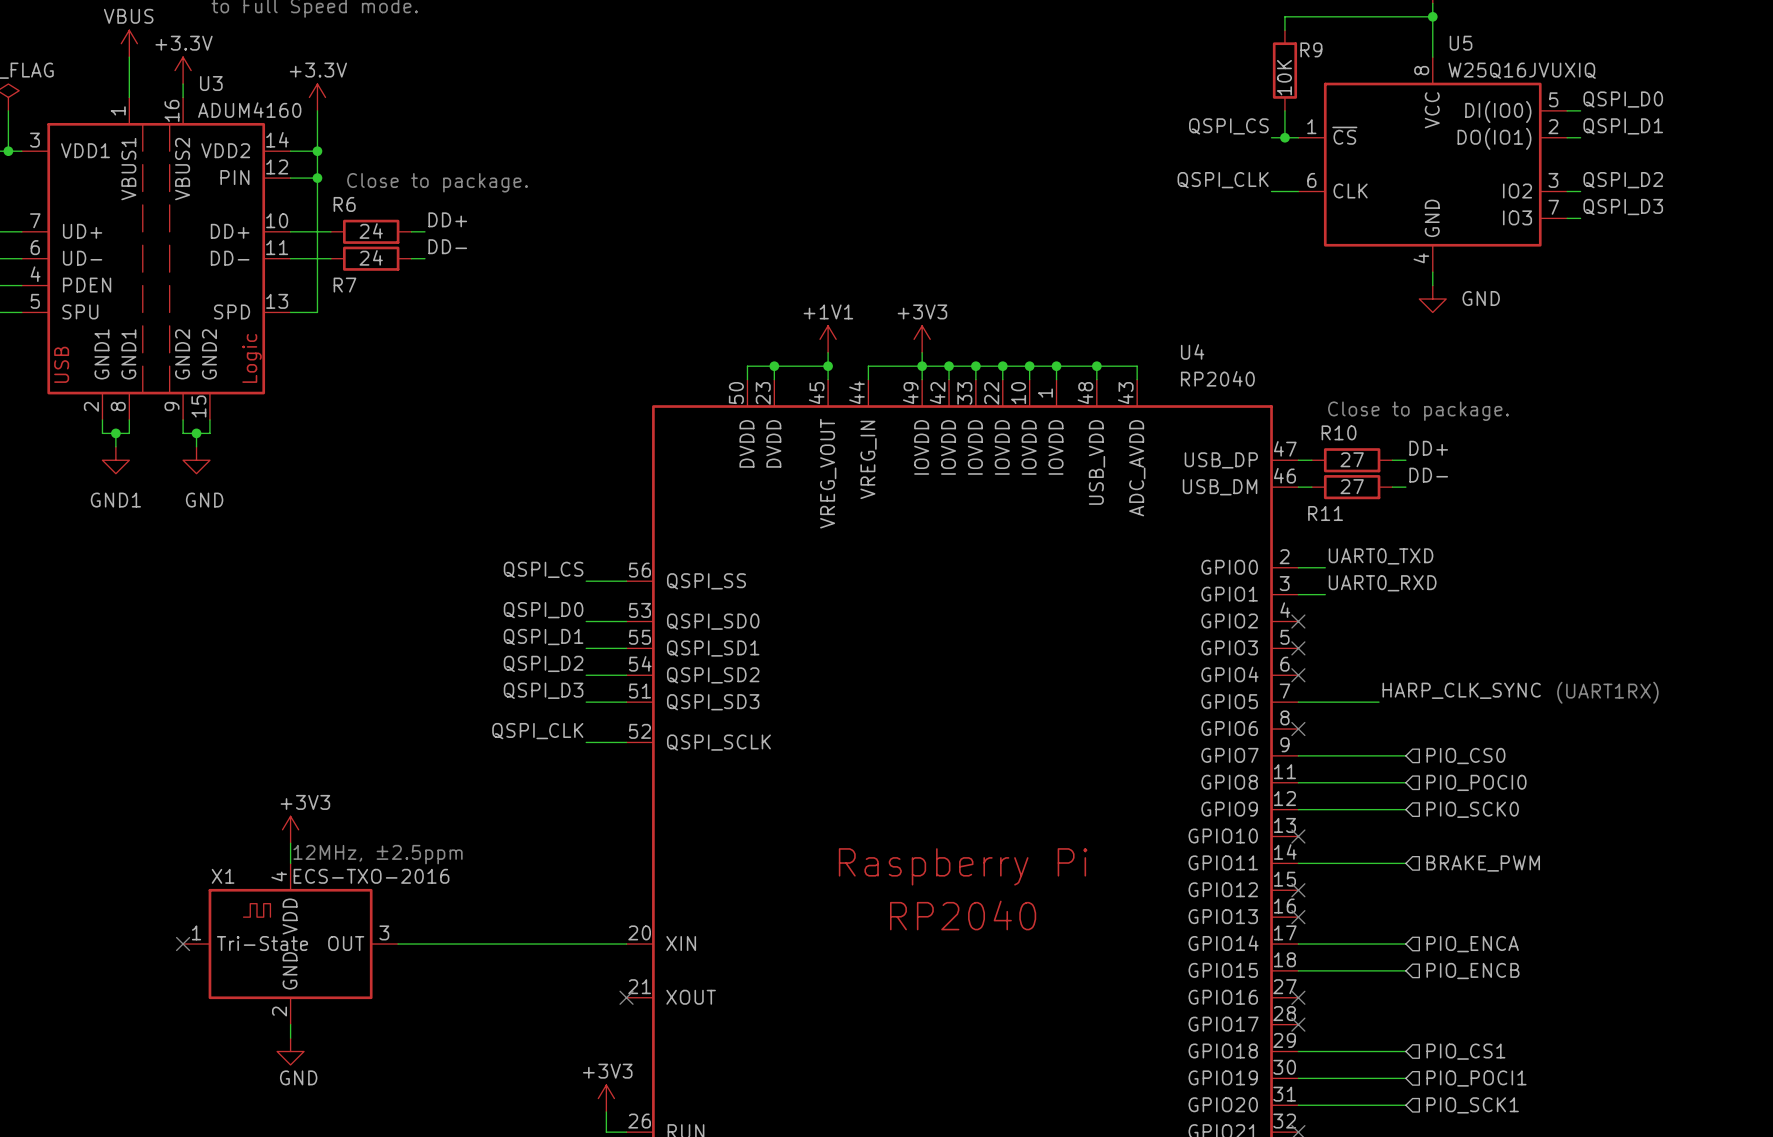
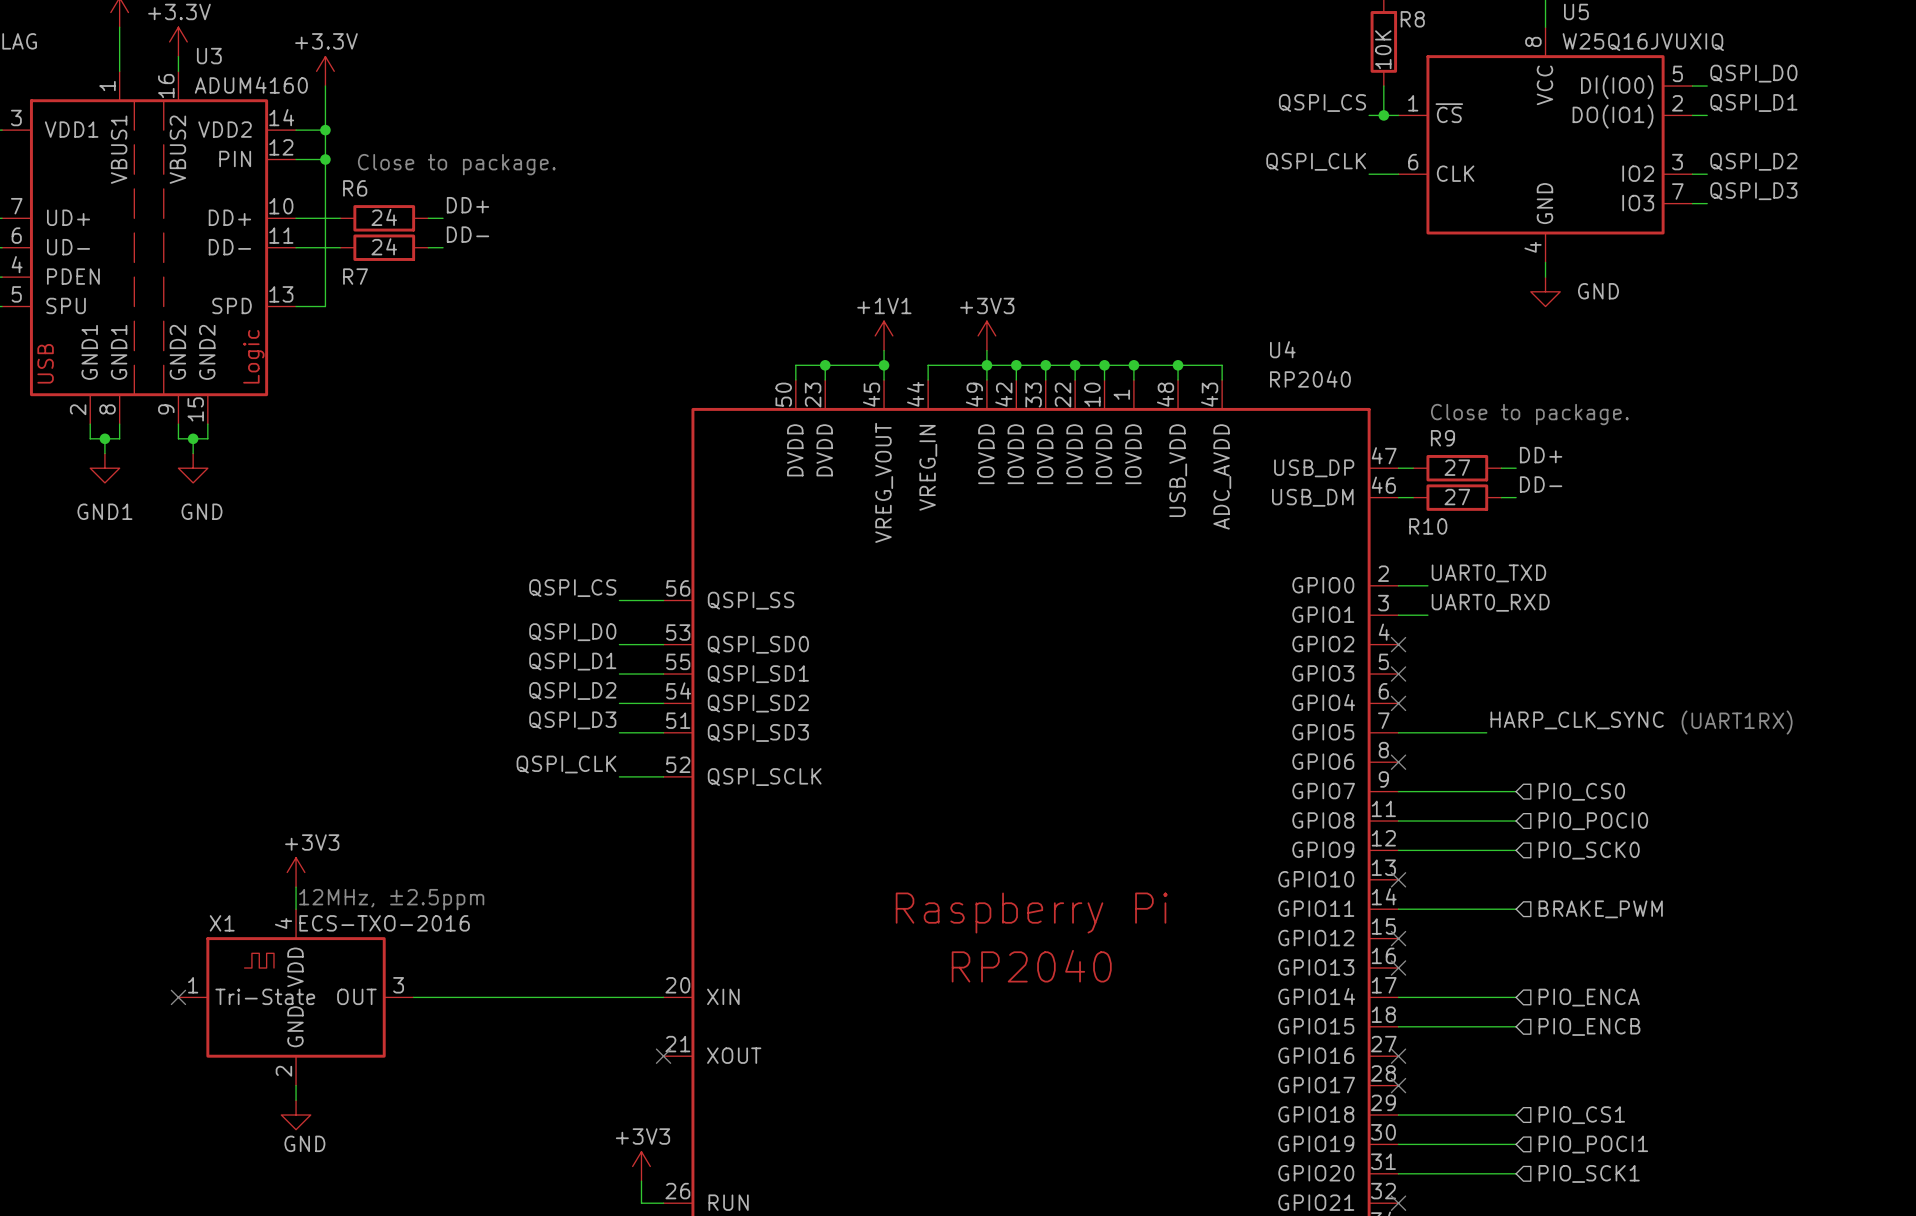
R9 name: R9 (1311, 49) -> R8 (1412, 19)
R10 name: R10 (1339, 432) -> R9 (1442, 438)
R11 name: R11 (1325, 513) -> R10 (1428, 526)

